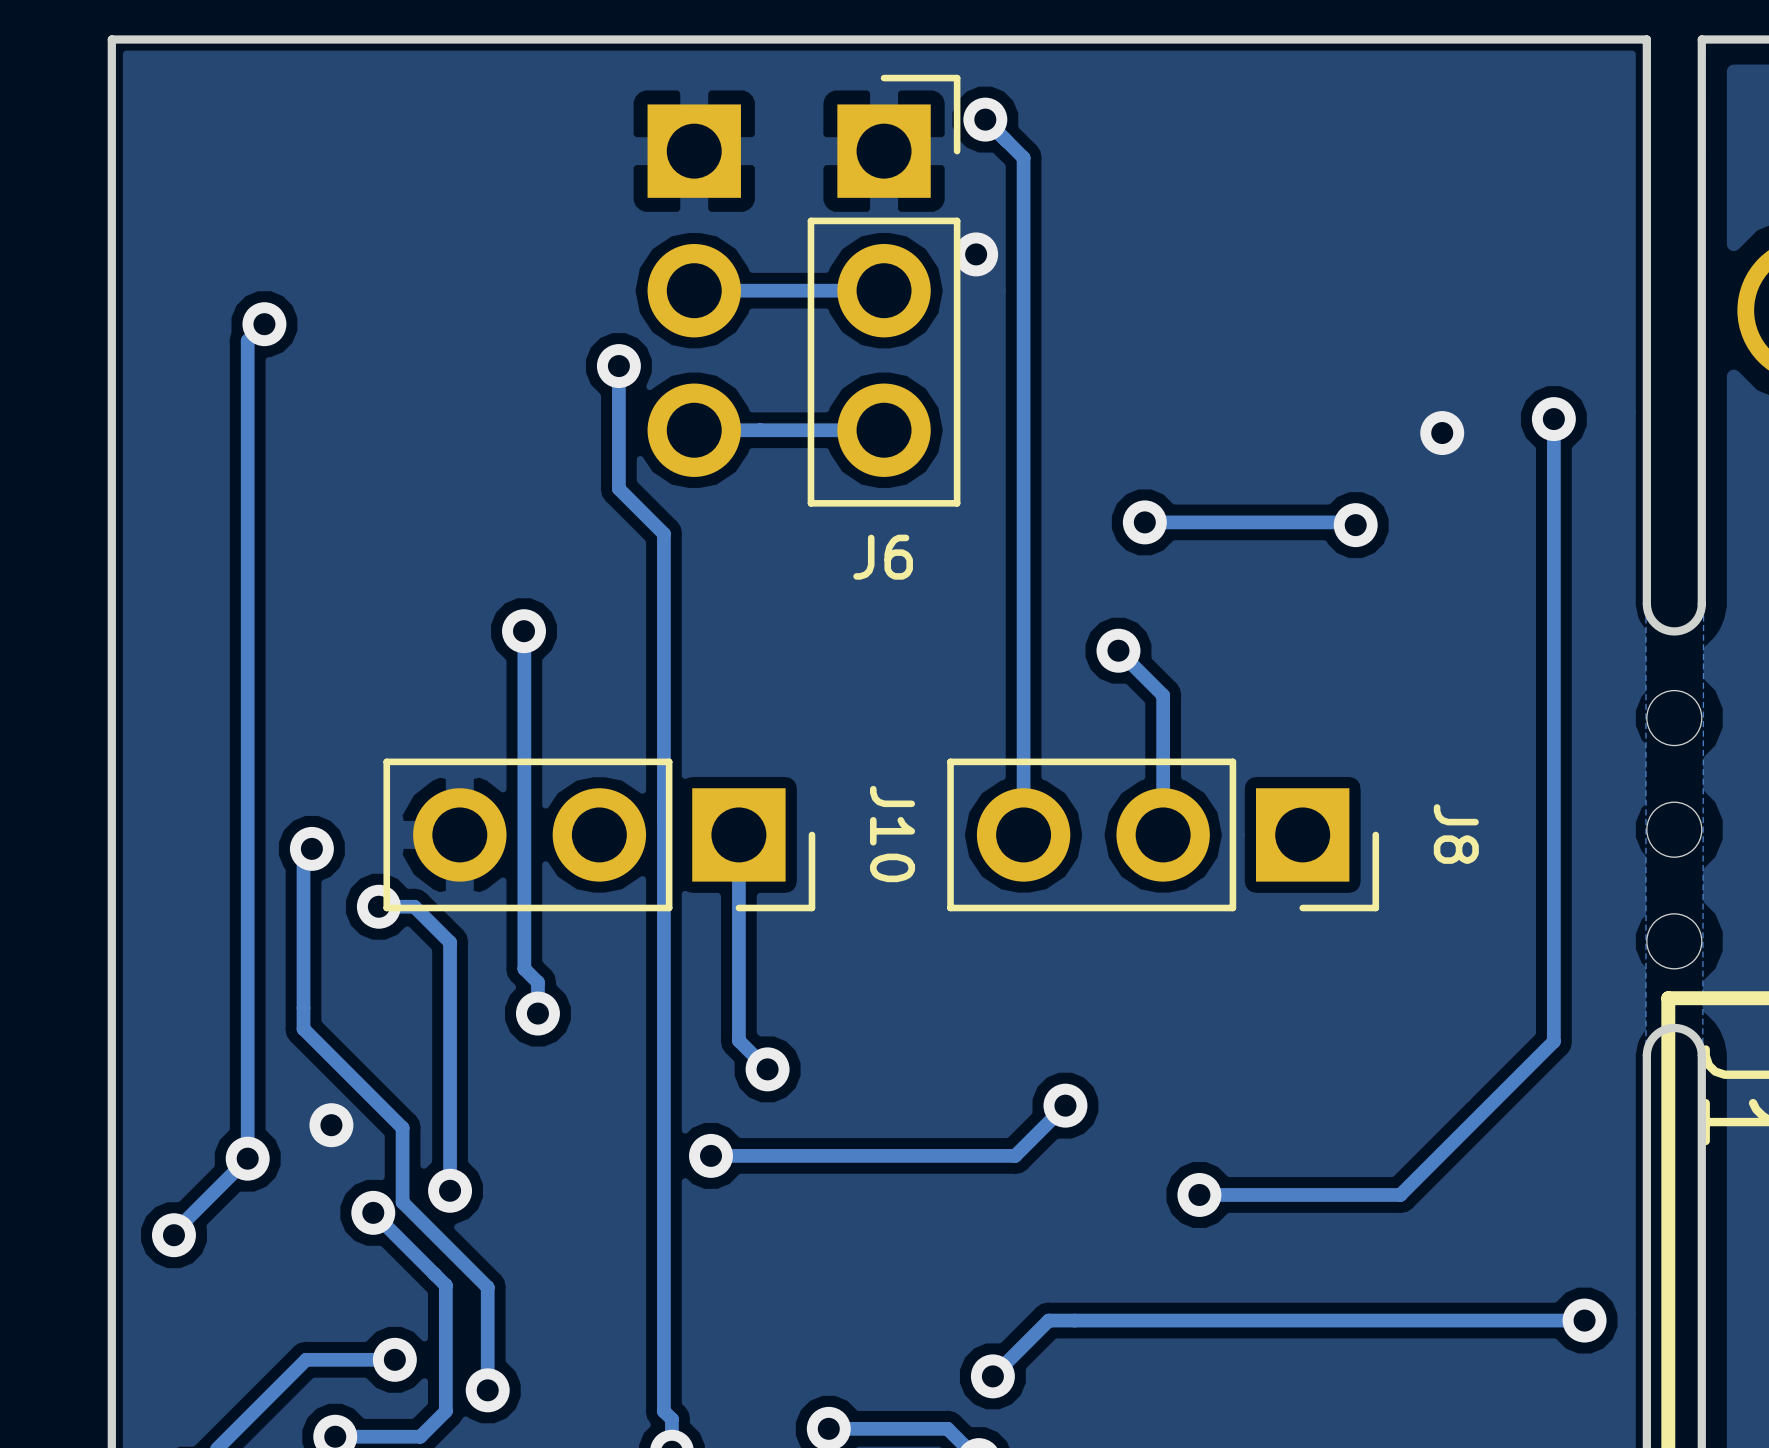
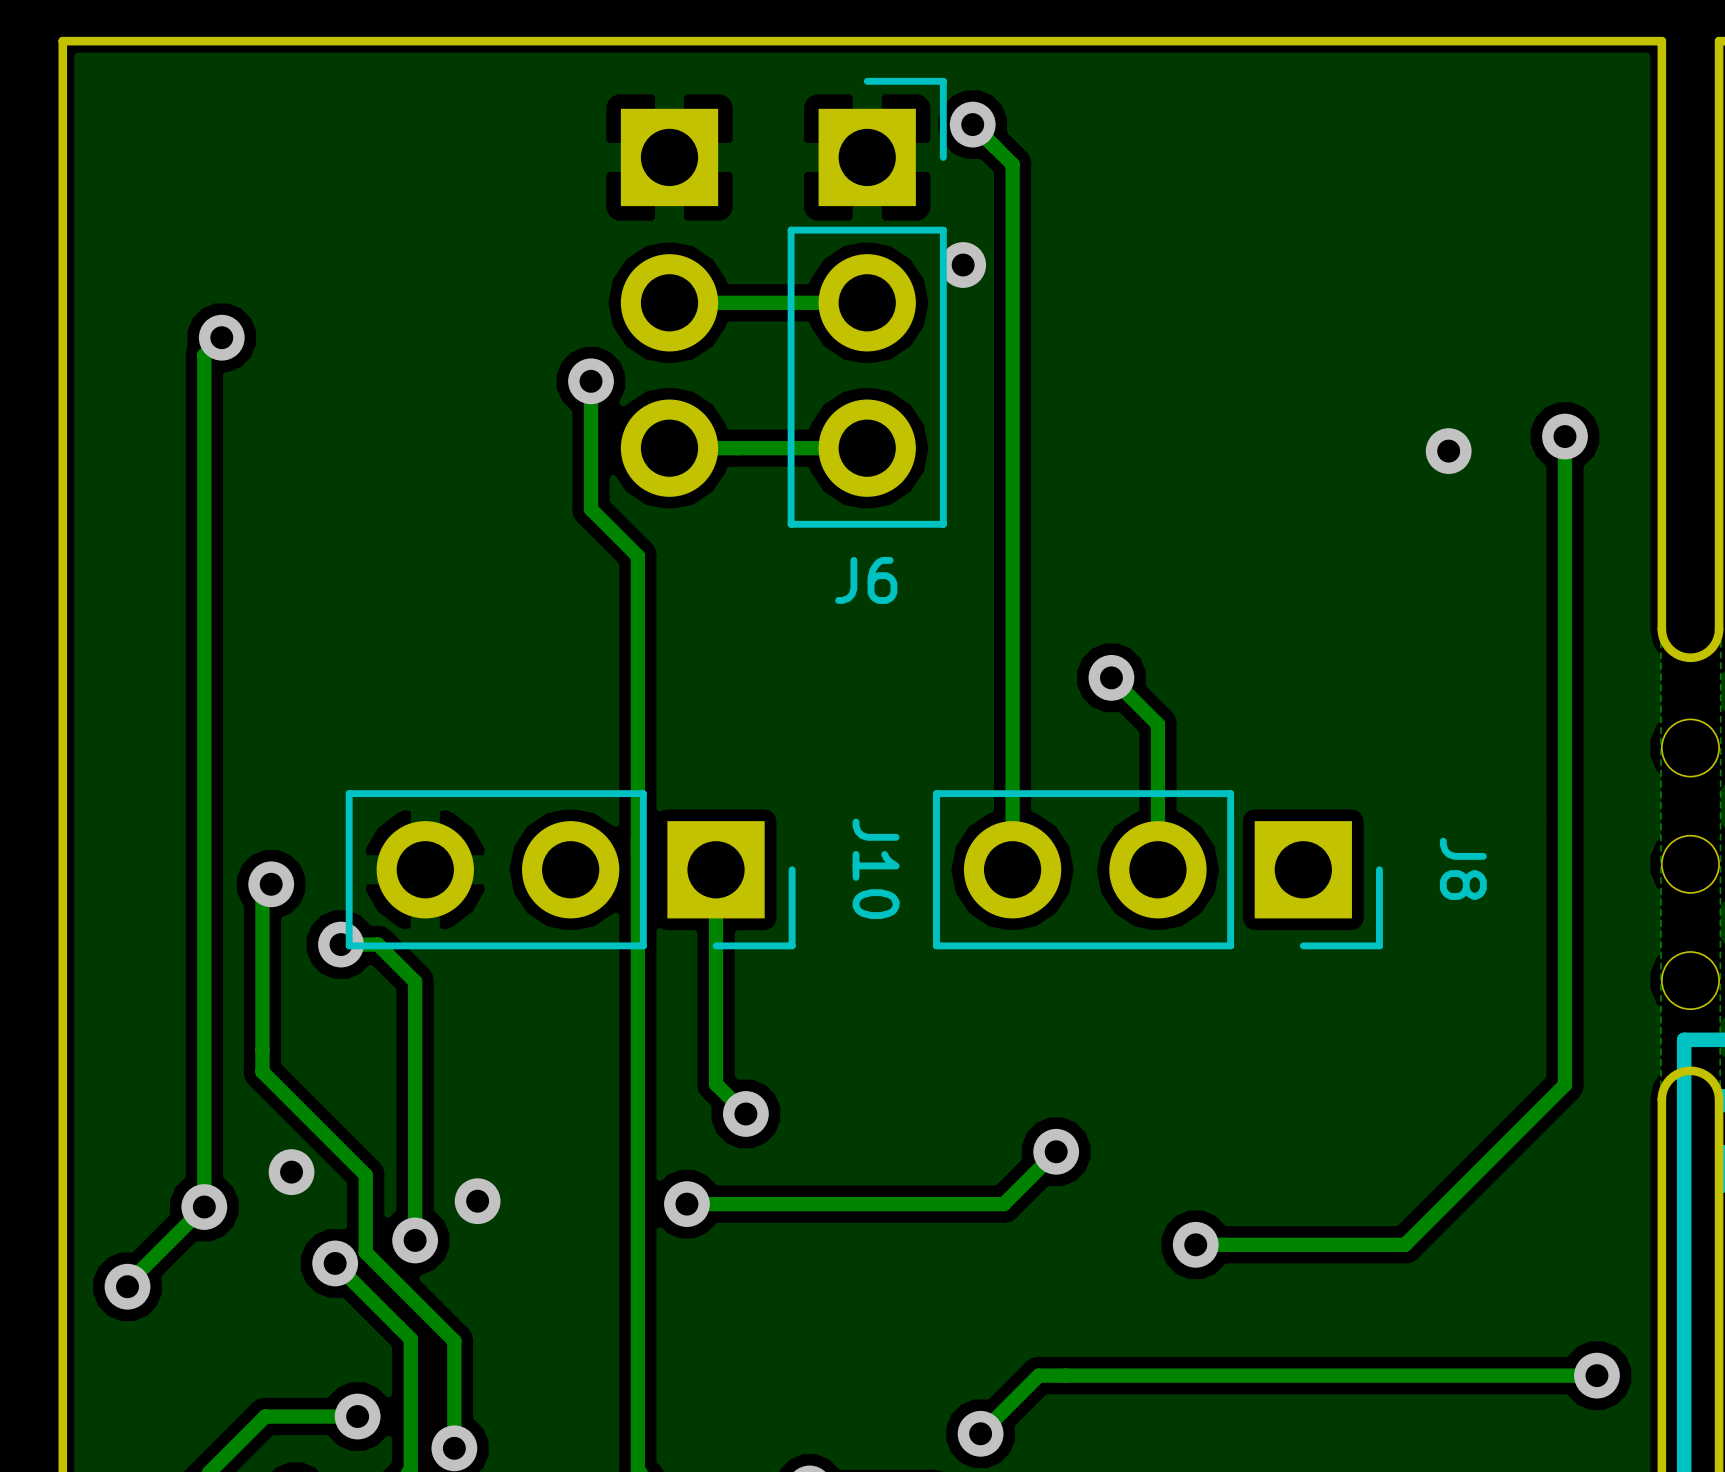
track: (1144, 522) (1352, 522) (1355, 525) -> none
via: (1144, 522) -> none
via: (1355, 525) -> none
track: (524, 631) (524, 968) (537, 982) (537, 1013) -> none
via: (524, 631) -> none
via position: (537, 1013) -> (477, 1201)

